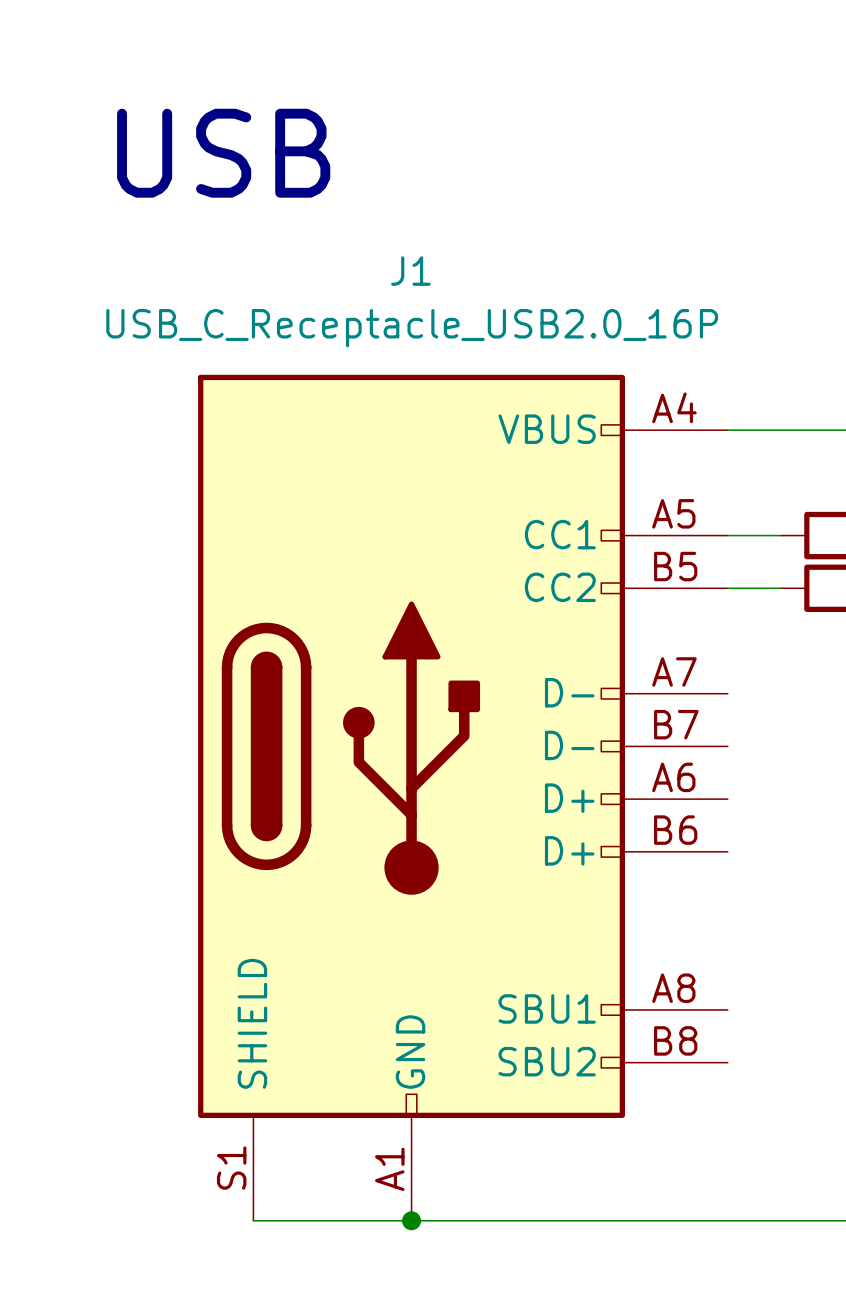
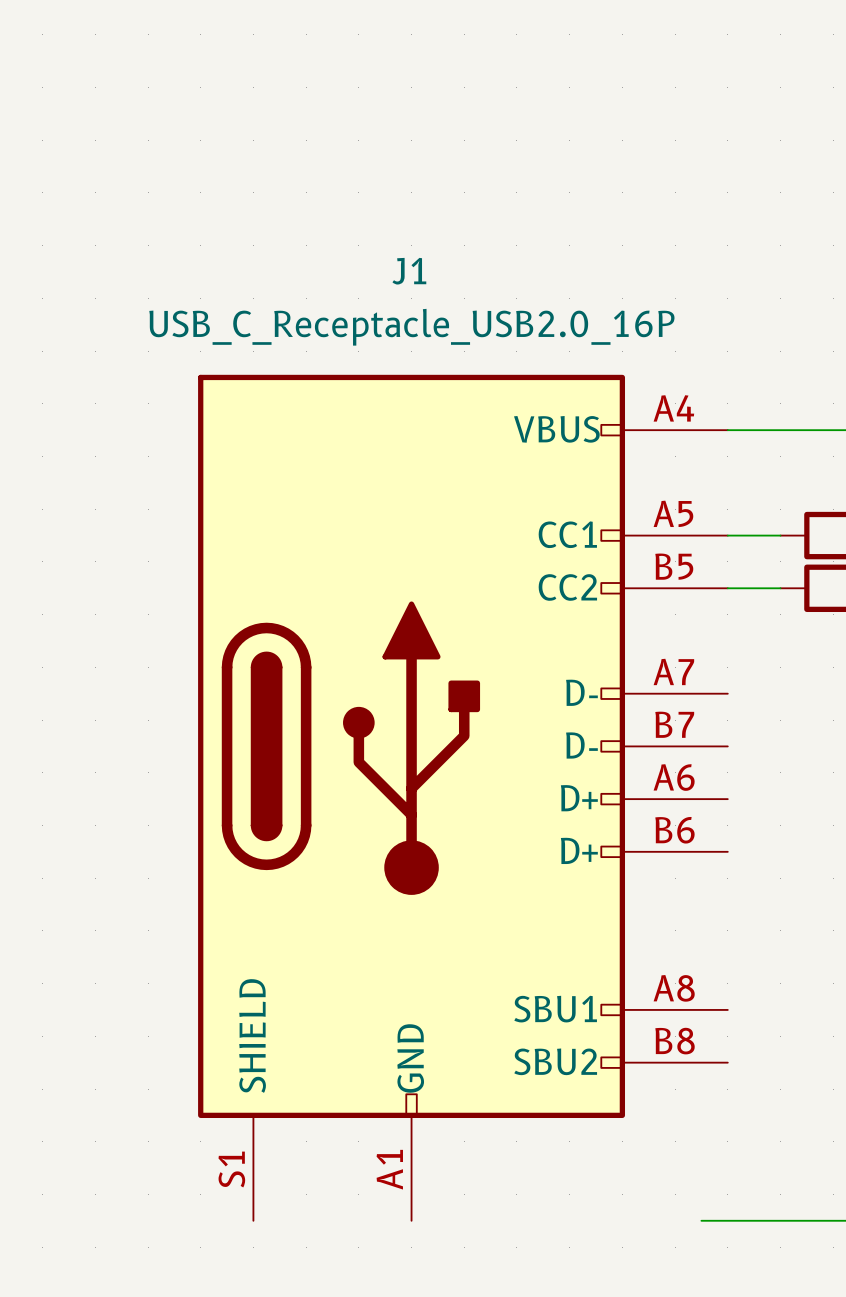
text: USB (223, 153) -> none
wire: (253, 1220) (701, 1220) -> none
junction: (411, 1220) -> none

